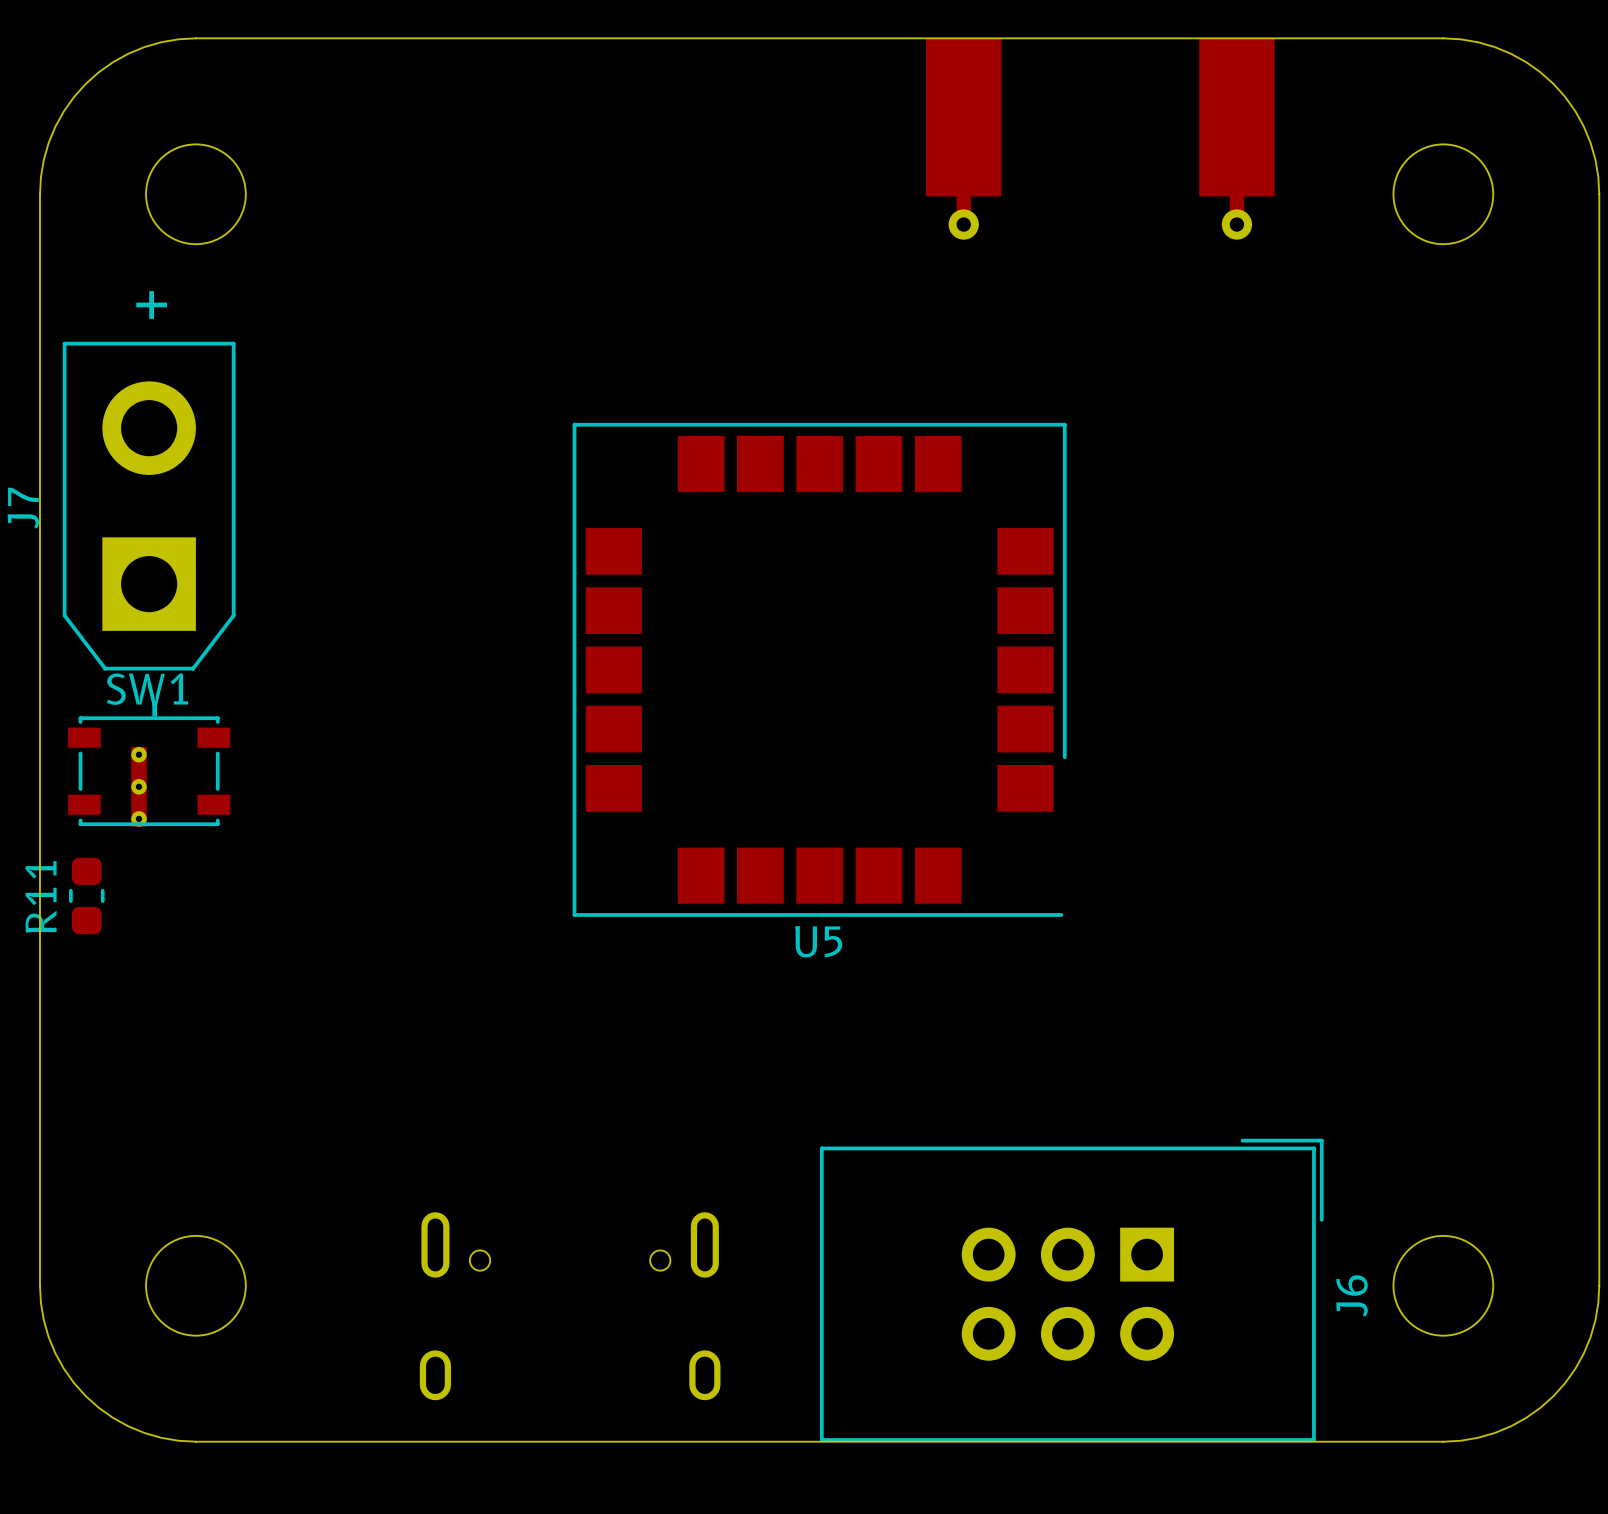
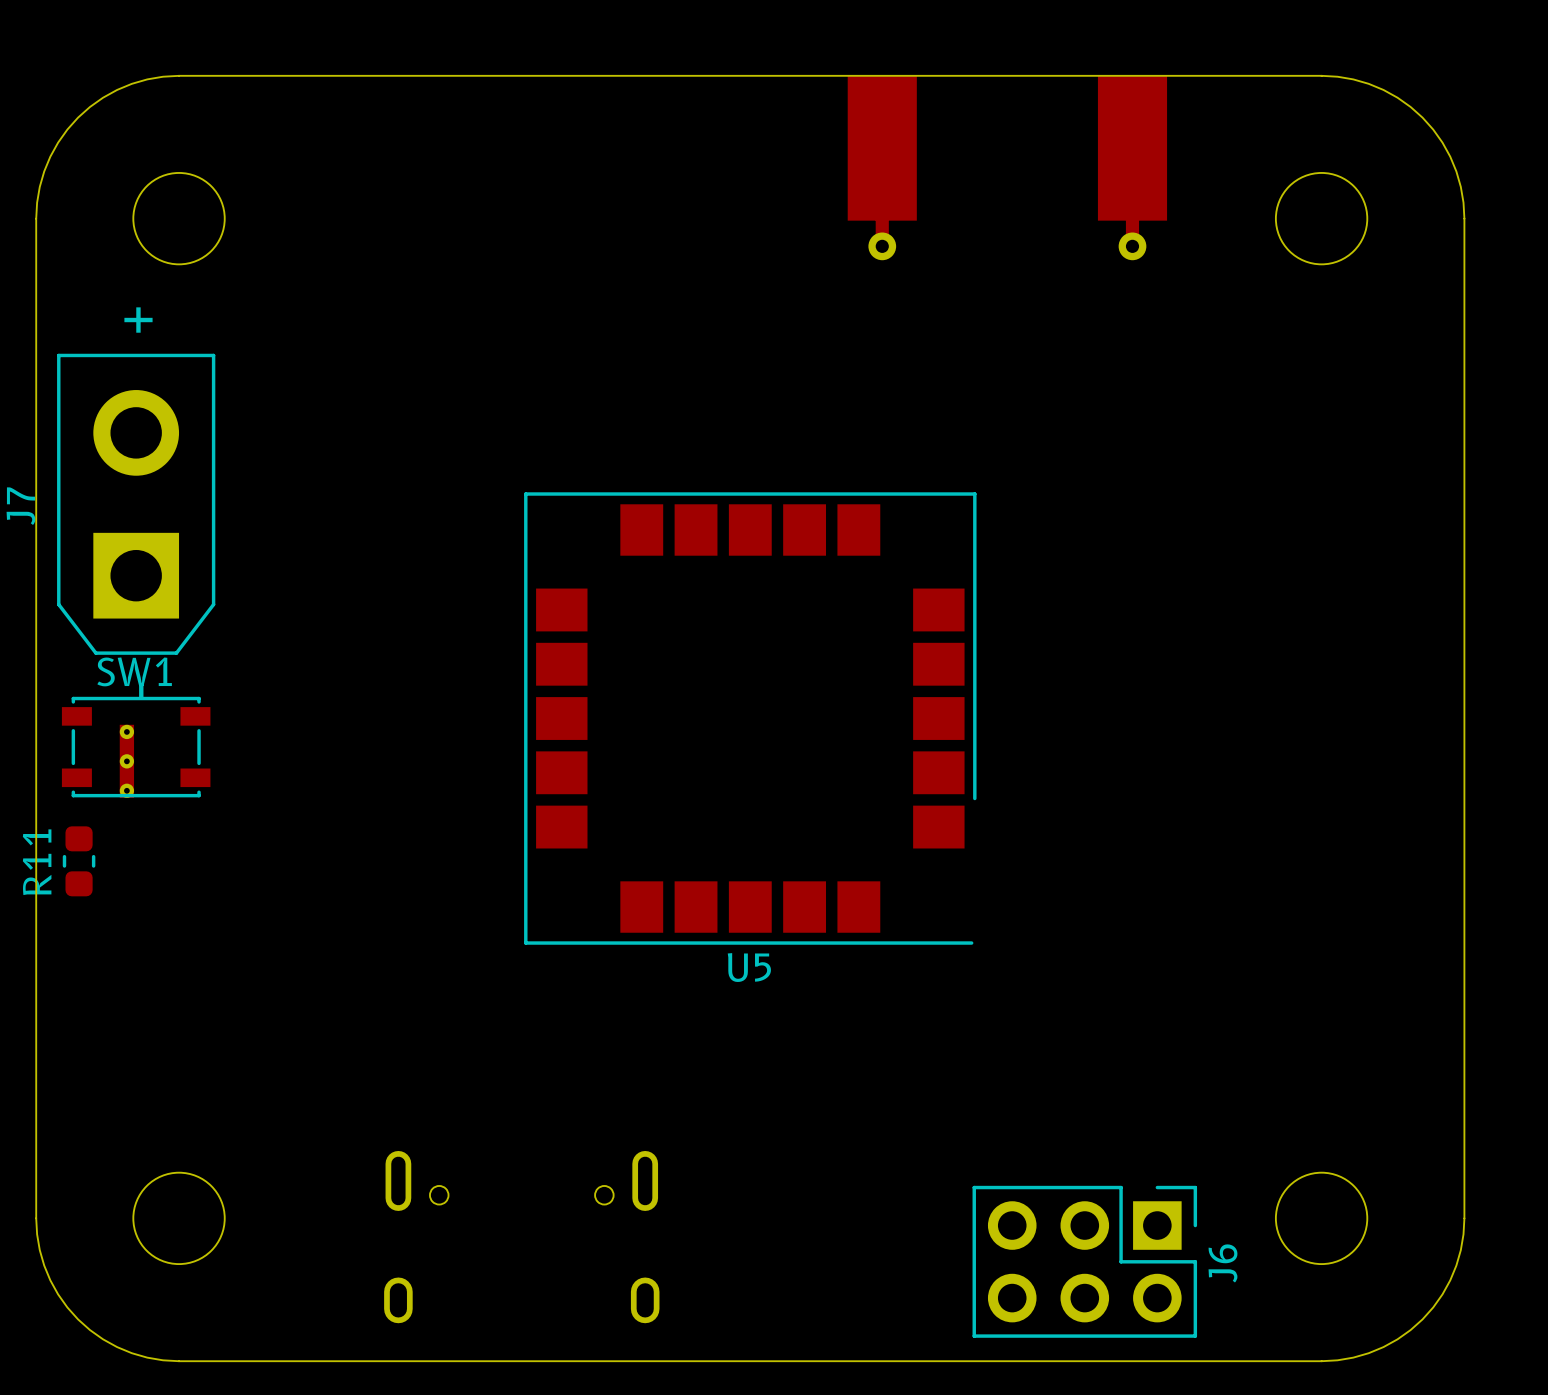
U5 position: (819, 669) -> (750, 718)
J6 footprint: [819, 1138, 1324, 1442] -> [972, 1185, 1198, 1338]
J6 name position: J6 (1352, 1295) -> J6 (1222, 1263)

